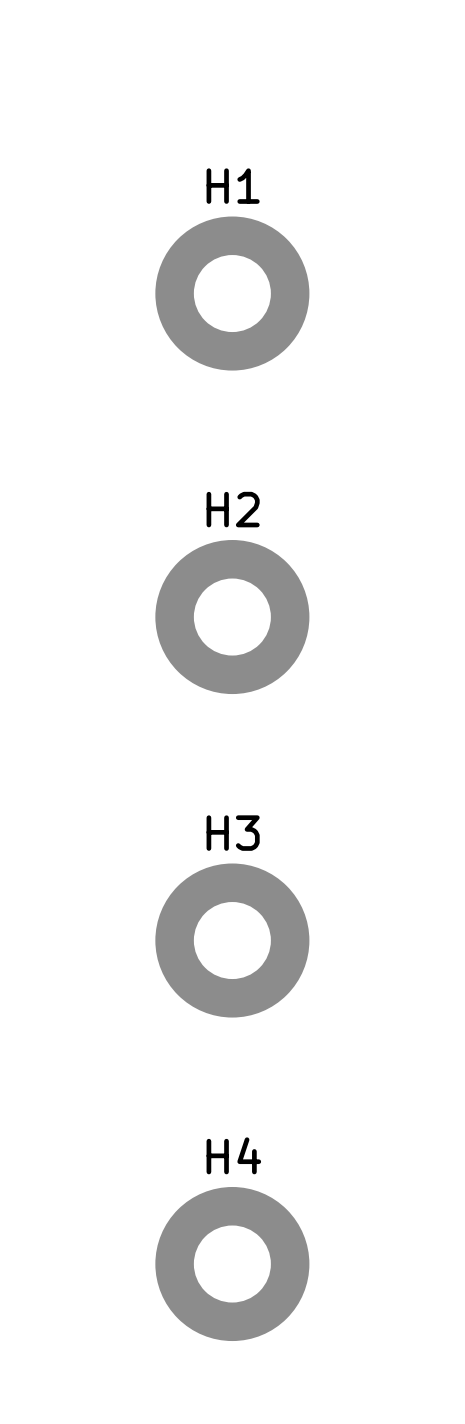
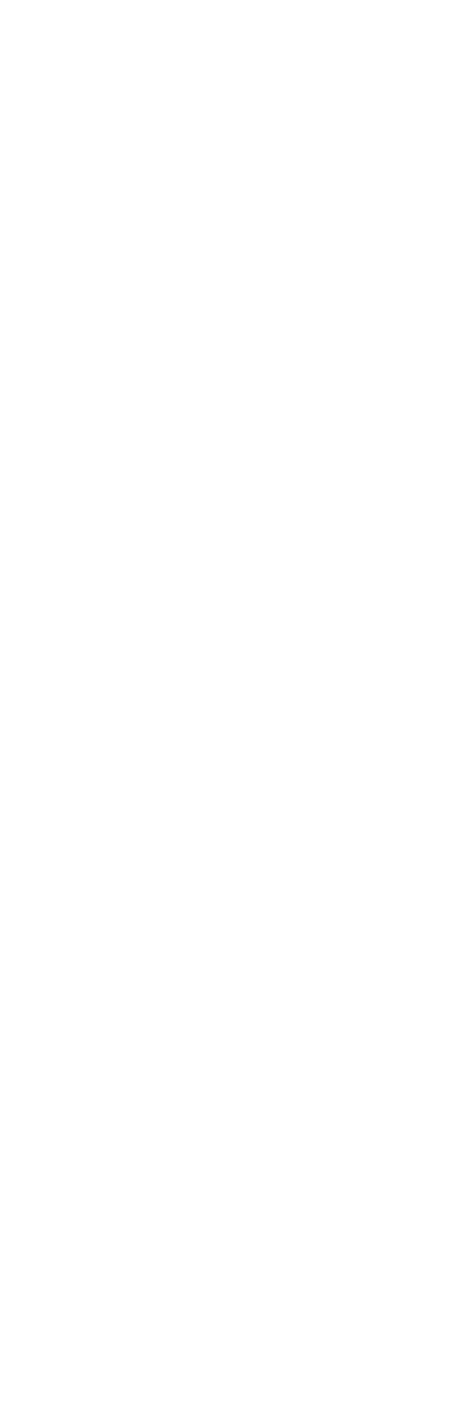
H1: (232, 293) -> none
H2: (232, 617) -> none
H3: (232, 940) -> none
H4: (232, 1264) -> none

